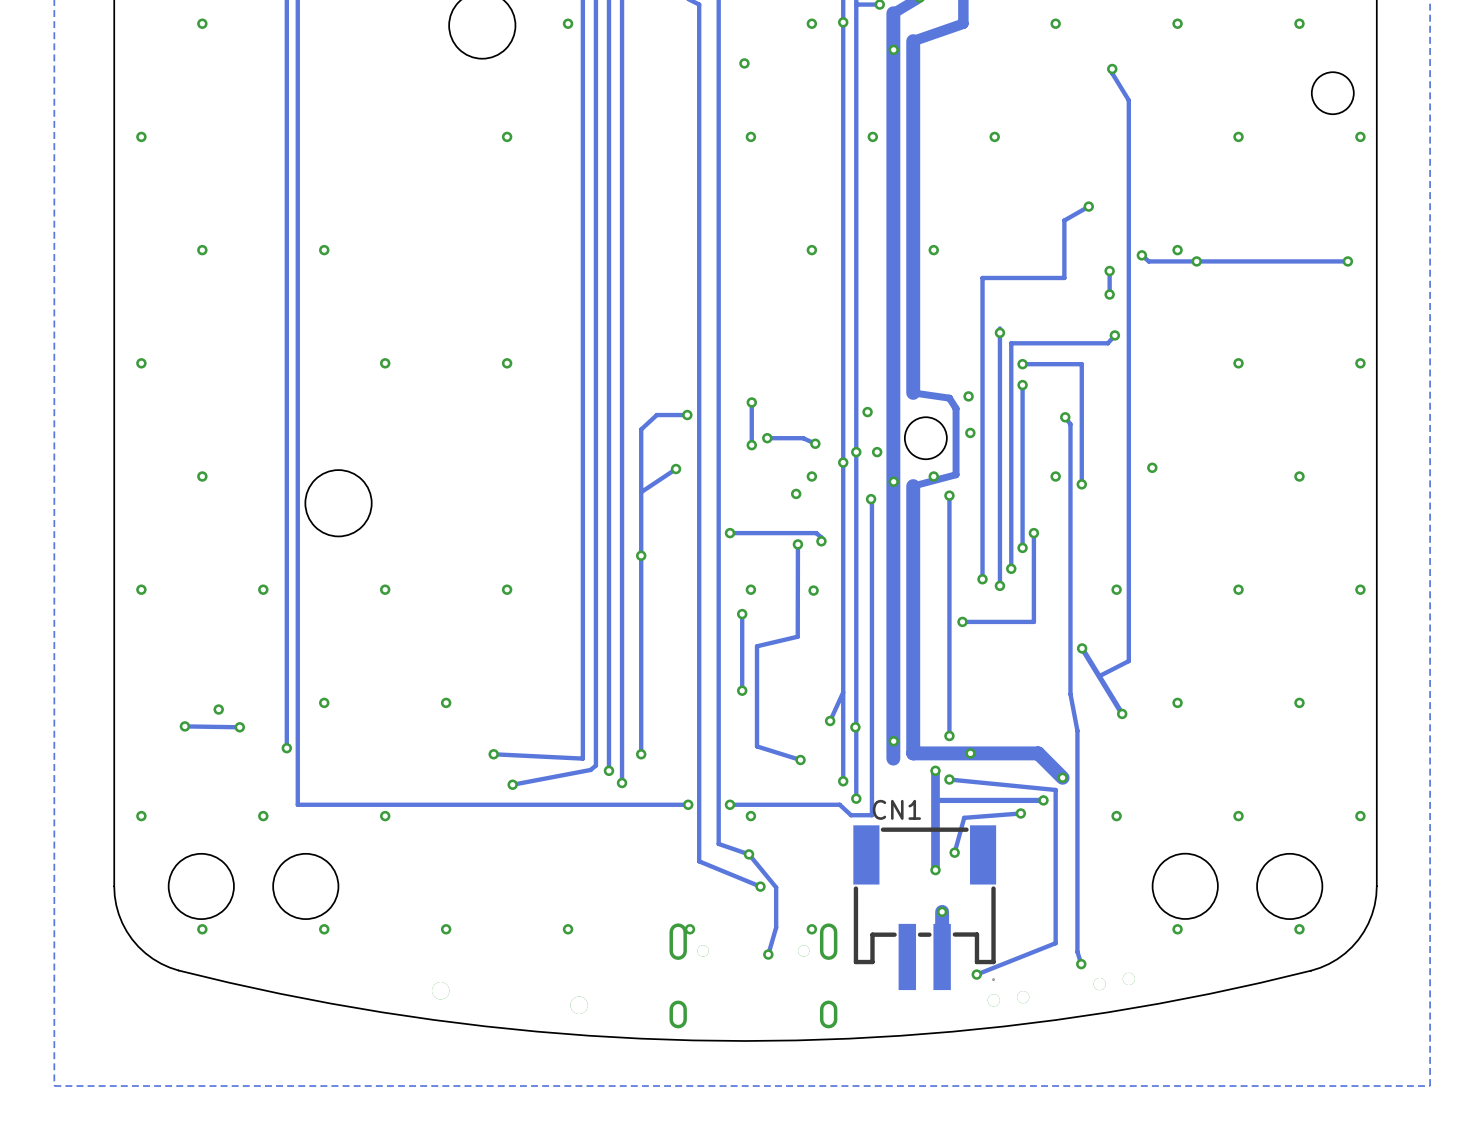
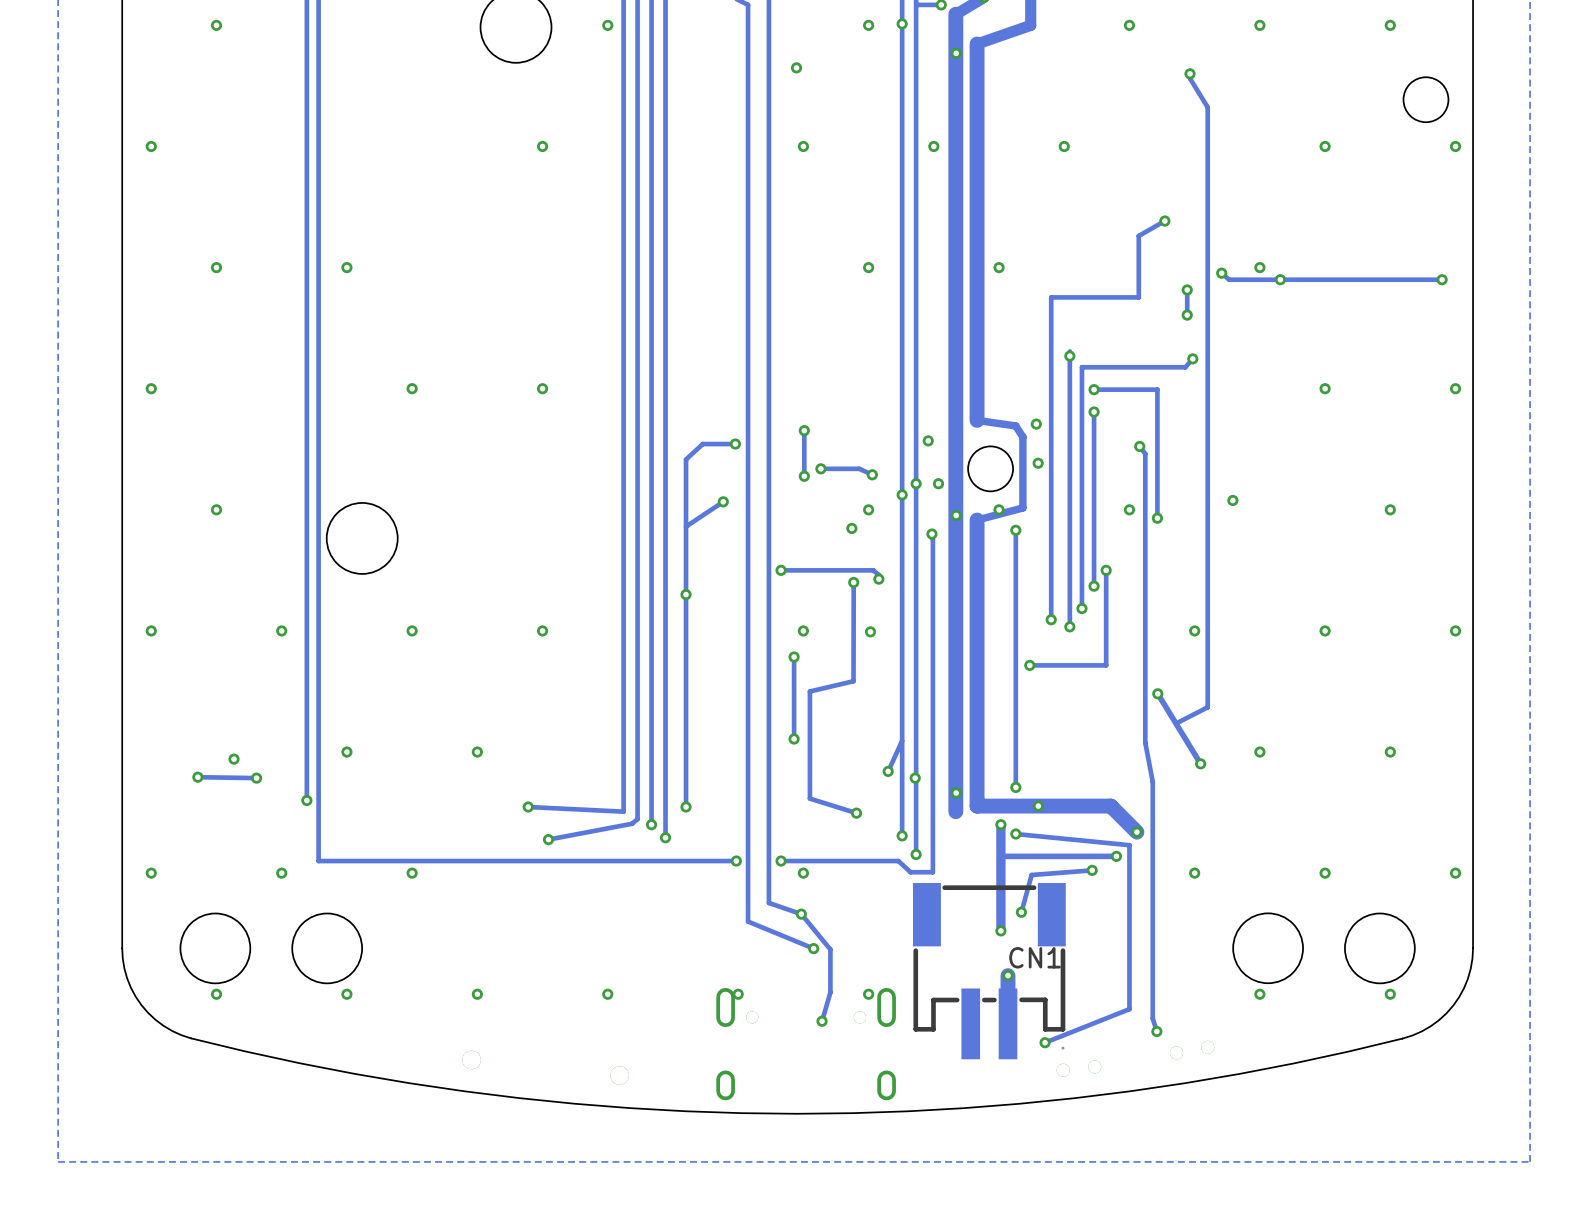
CN1 name position: CN1 (896, 809) -> CN1 (1035, 957)

